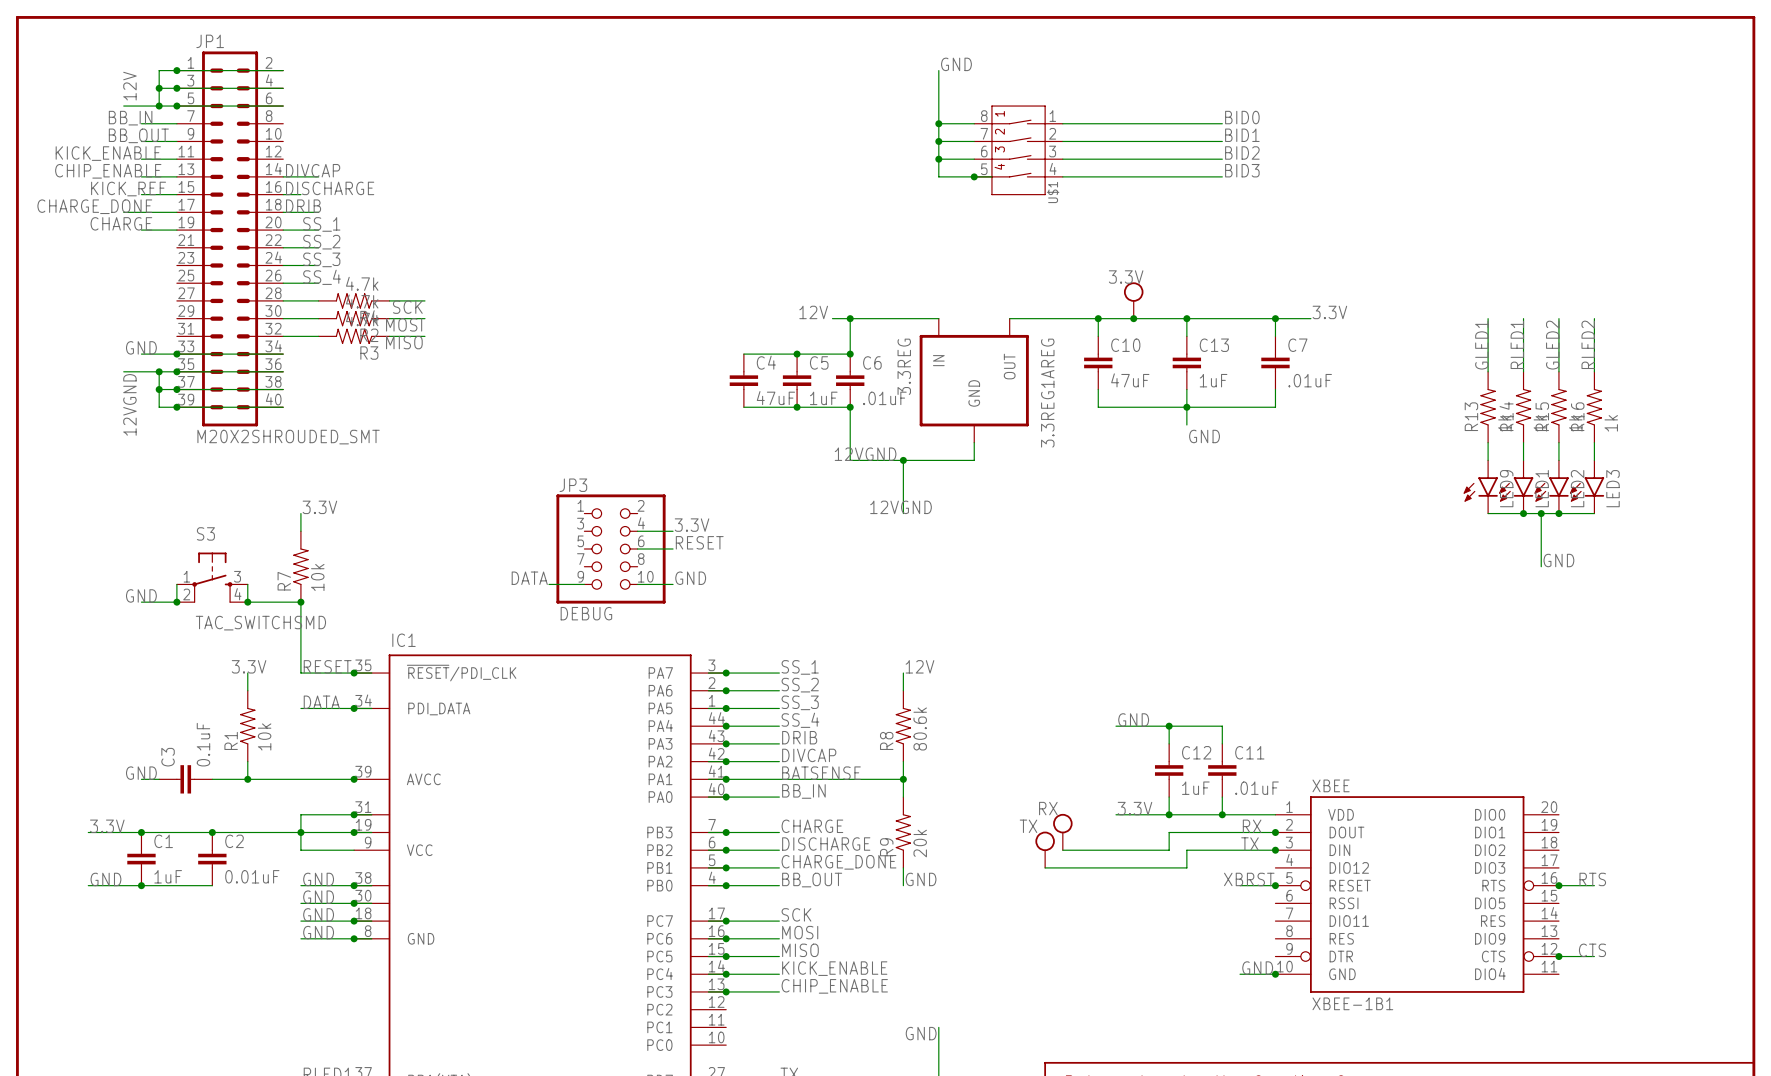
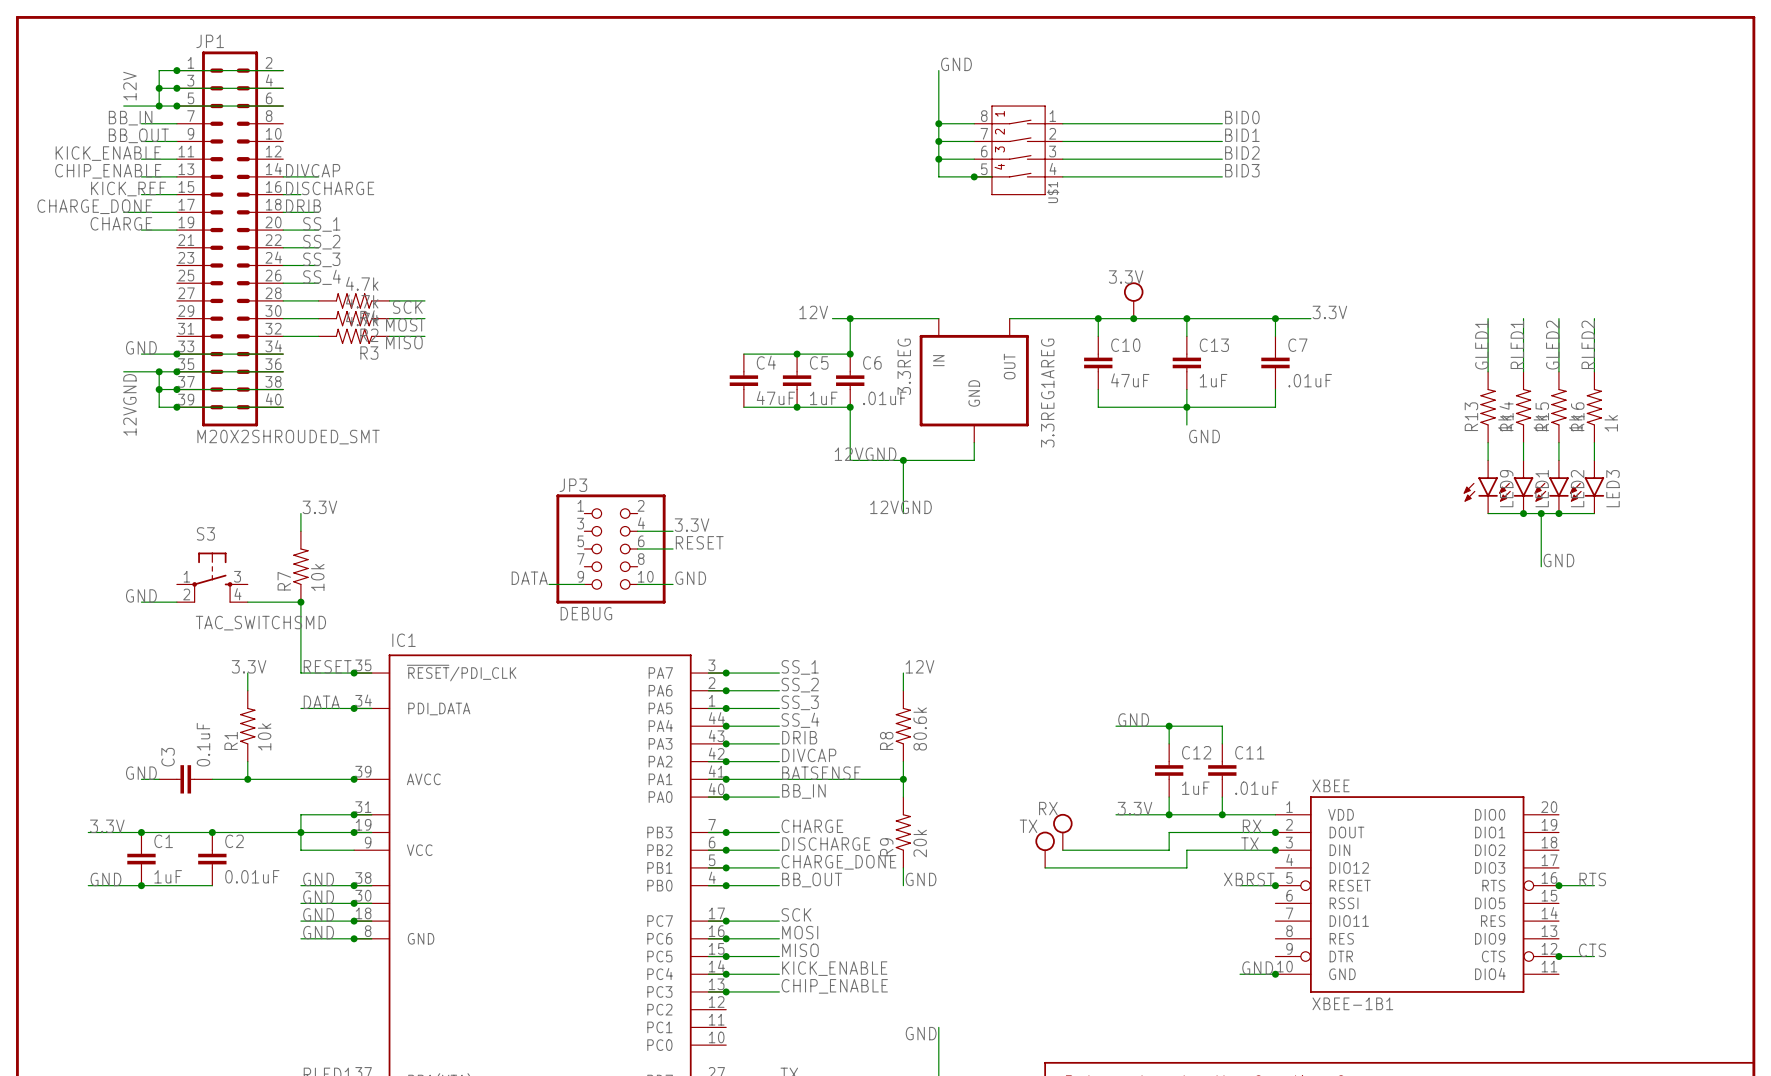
wire: (176, 584) (176, 602) -> none
wire: (247, 584) (247, 602) -> none
junction: (176, 602) -> none
junction: (247, 602) -> none

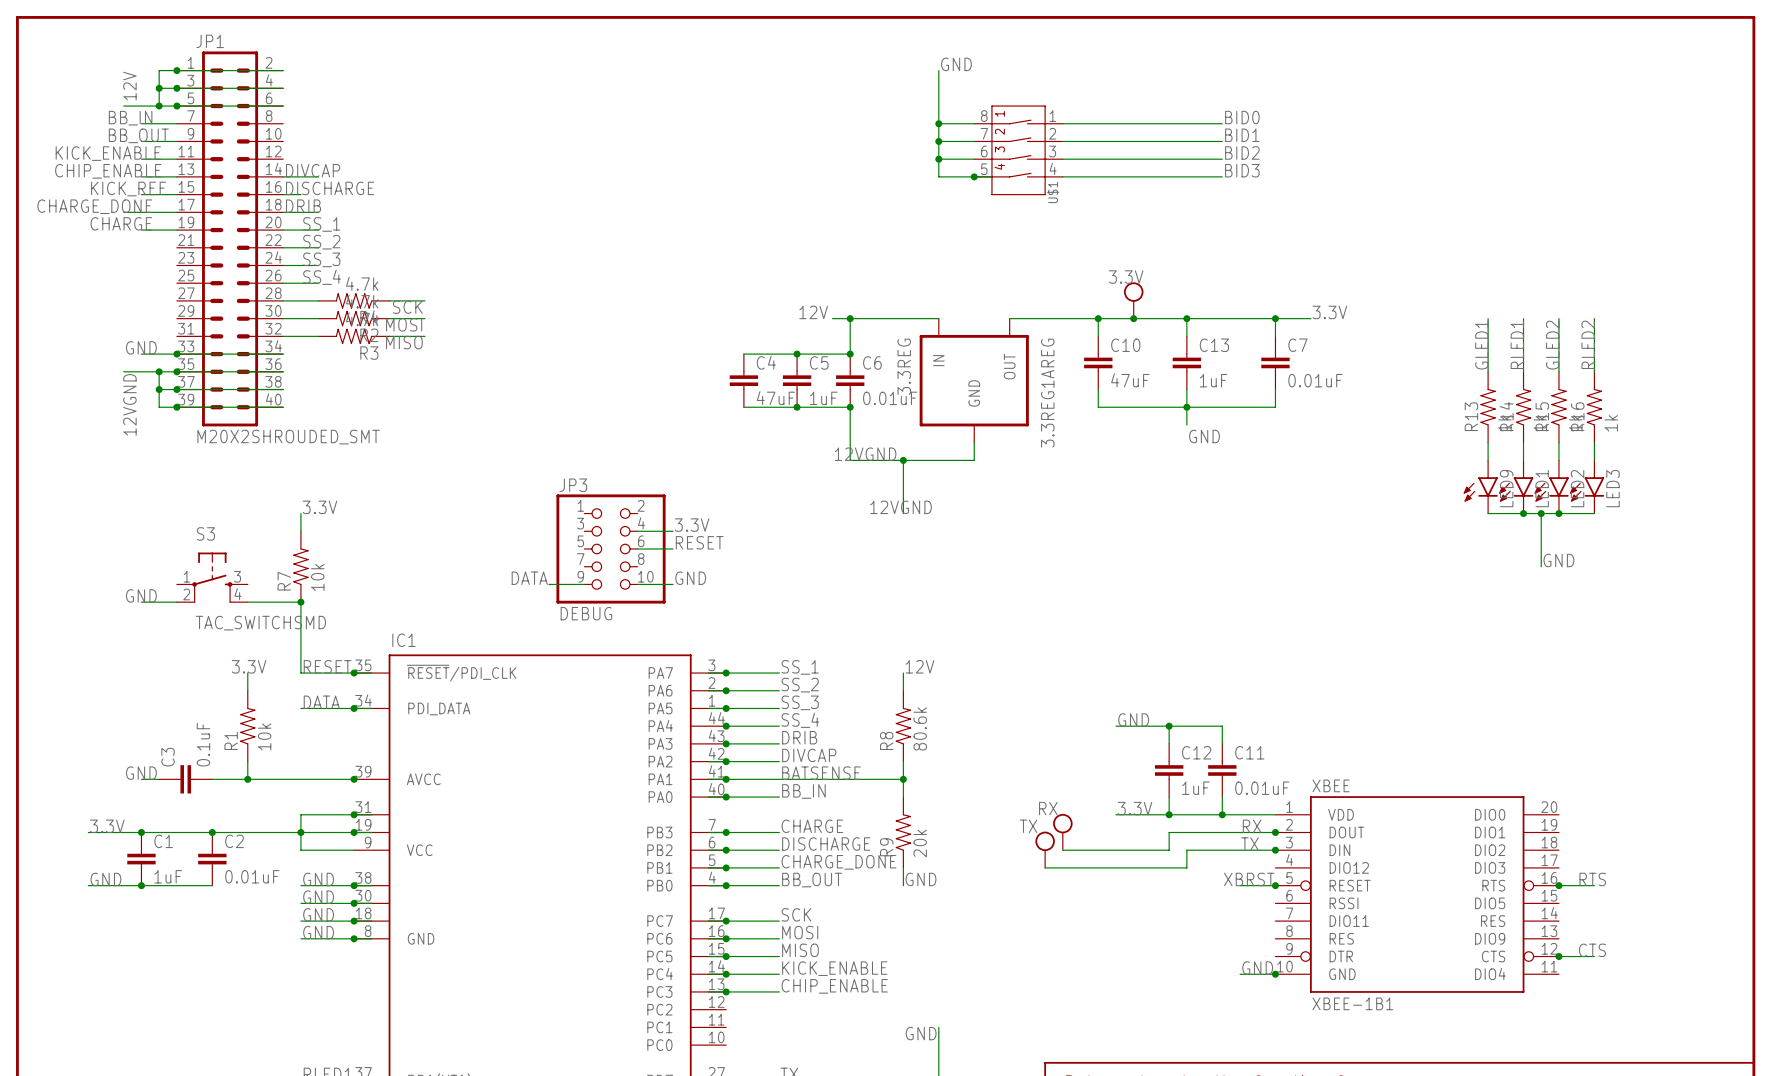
C7 value: .01uF (1310, 380) -> 0.01uF (1315, 380)
C6 value: .01uF (884, 398) -> 0.01uF (890, 398)
C11 value: .01uF (1256, 788) -> 0.01uF (1262, 788)

